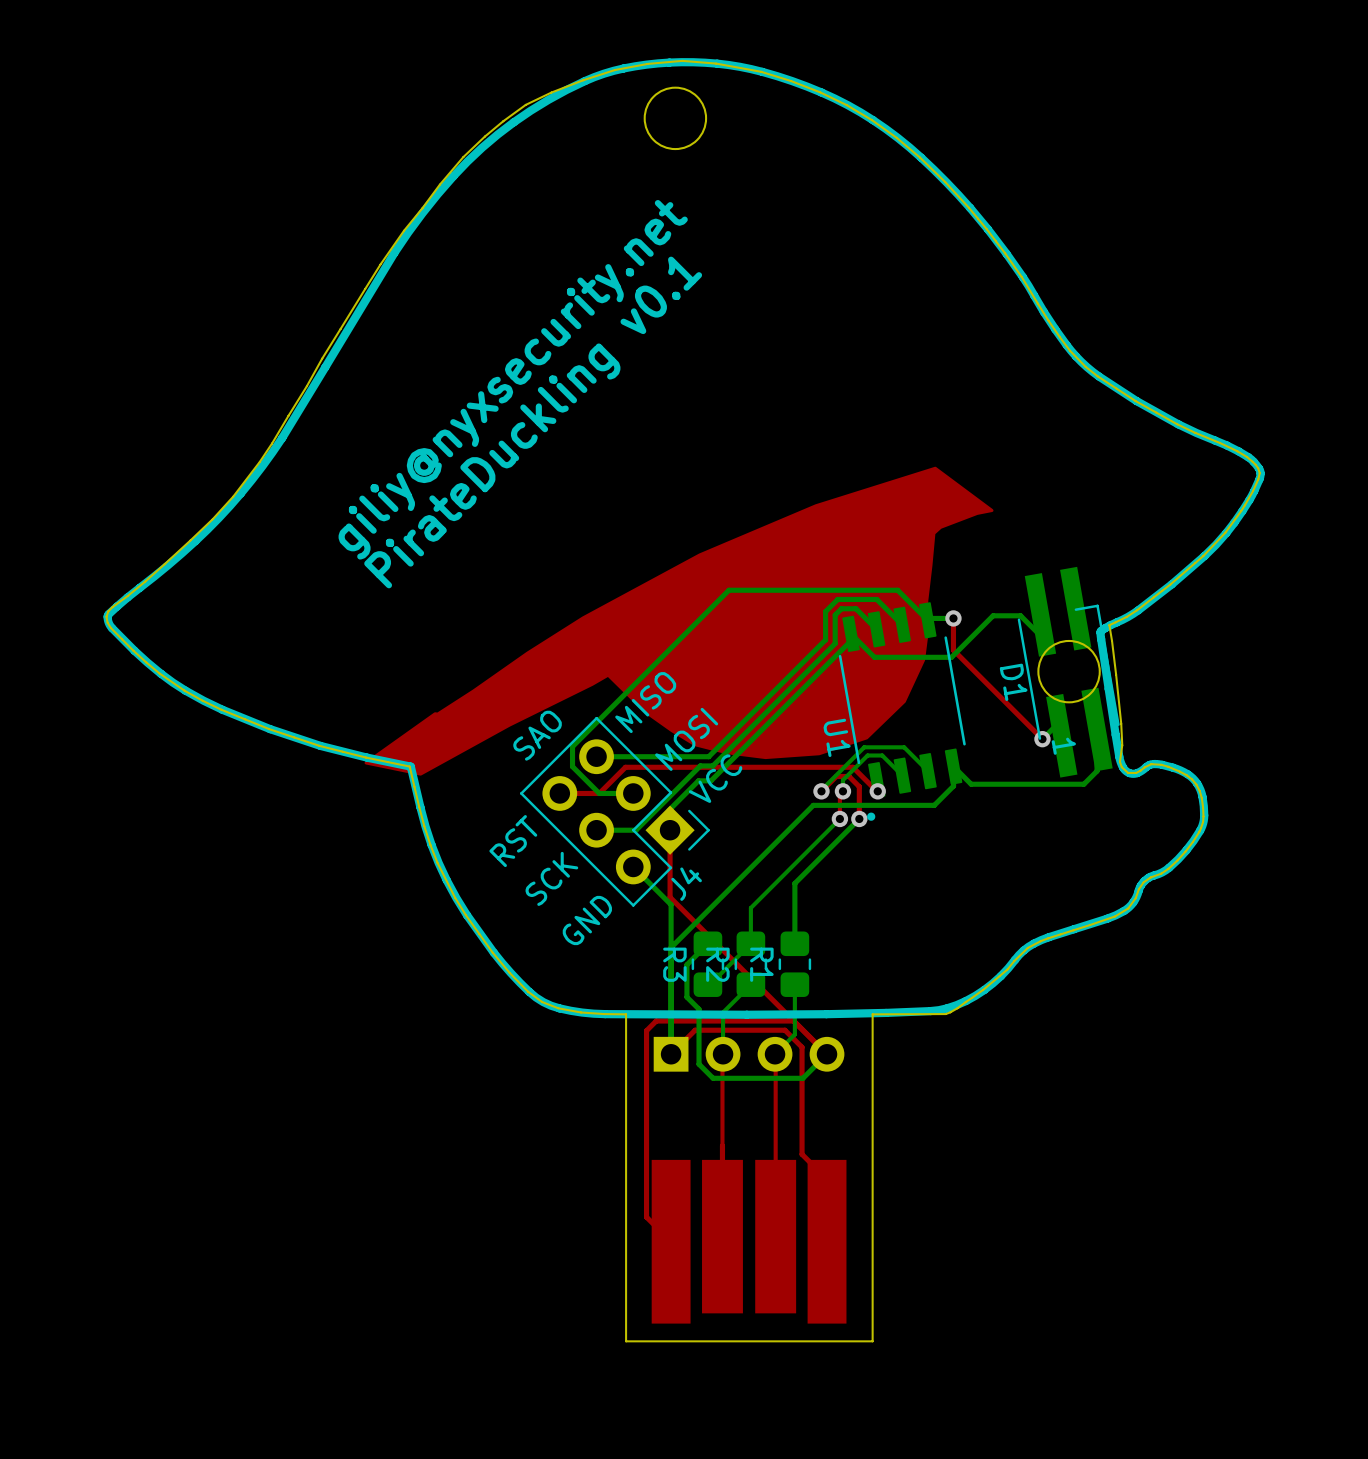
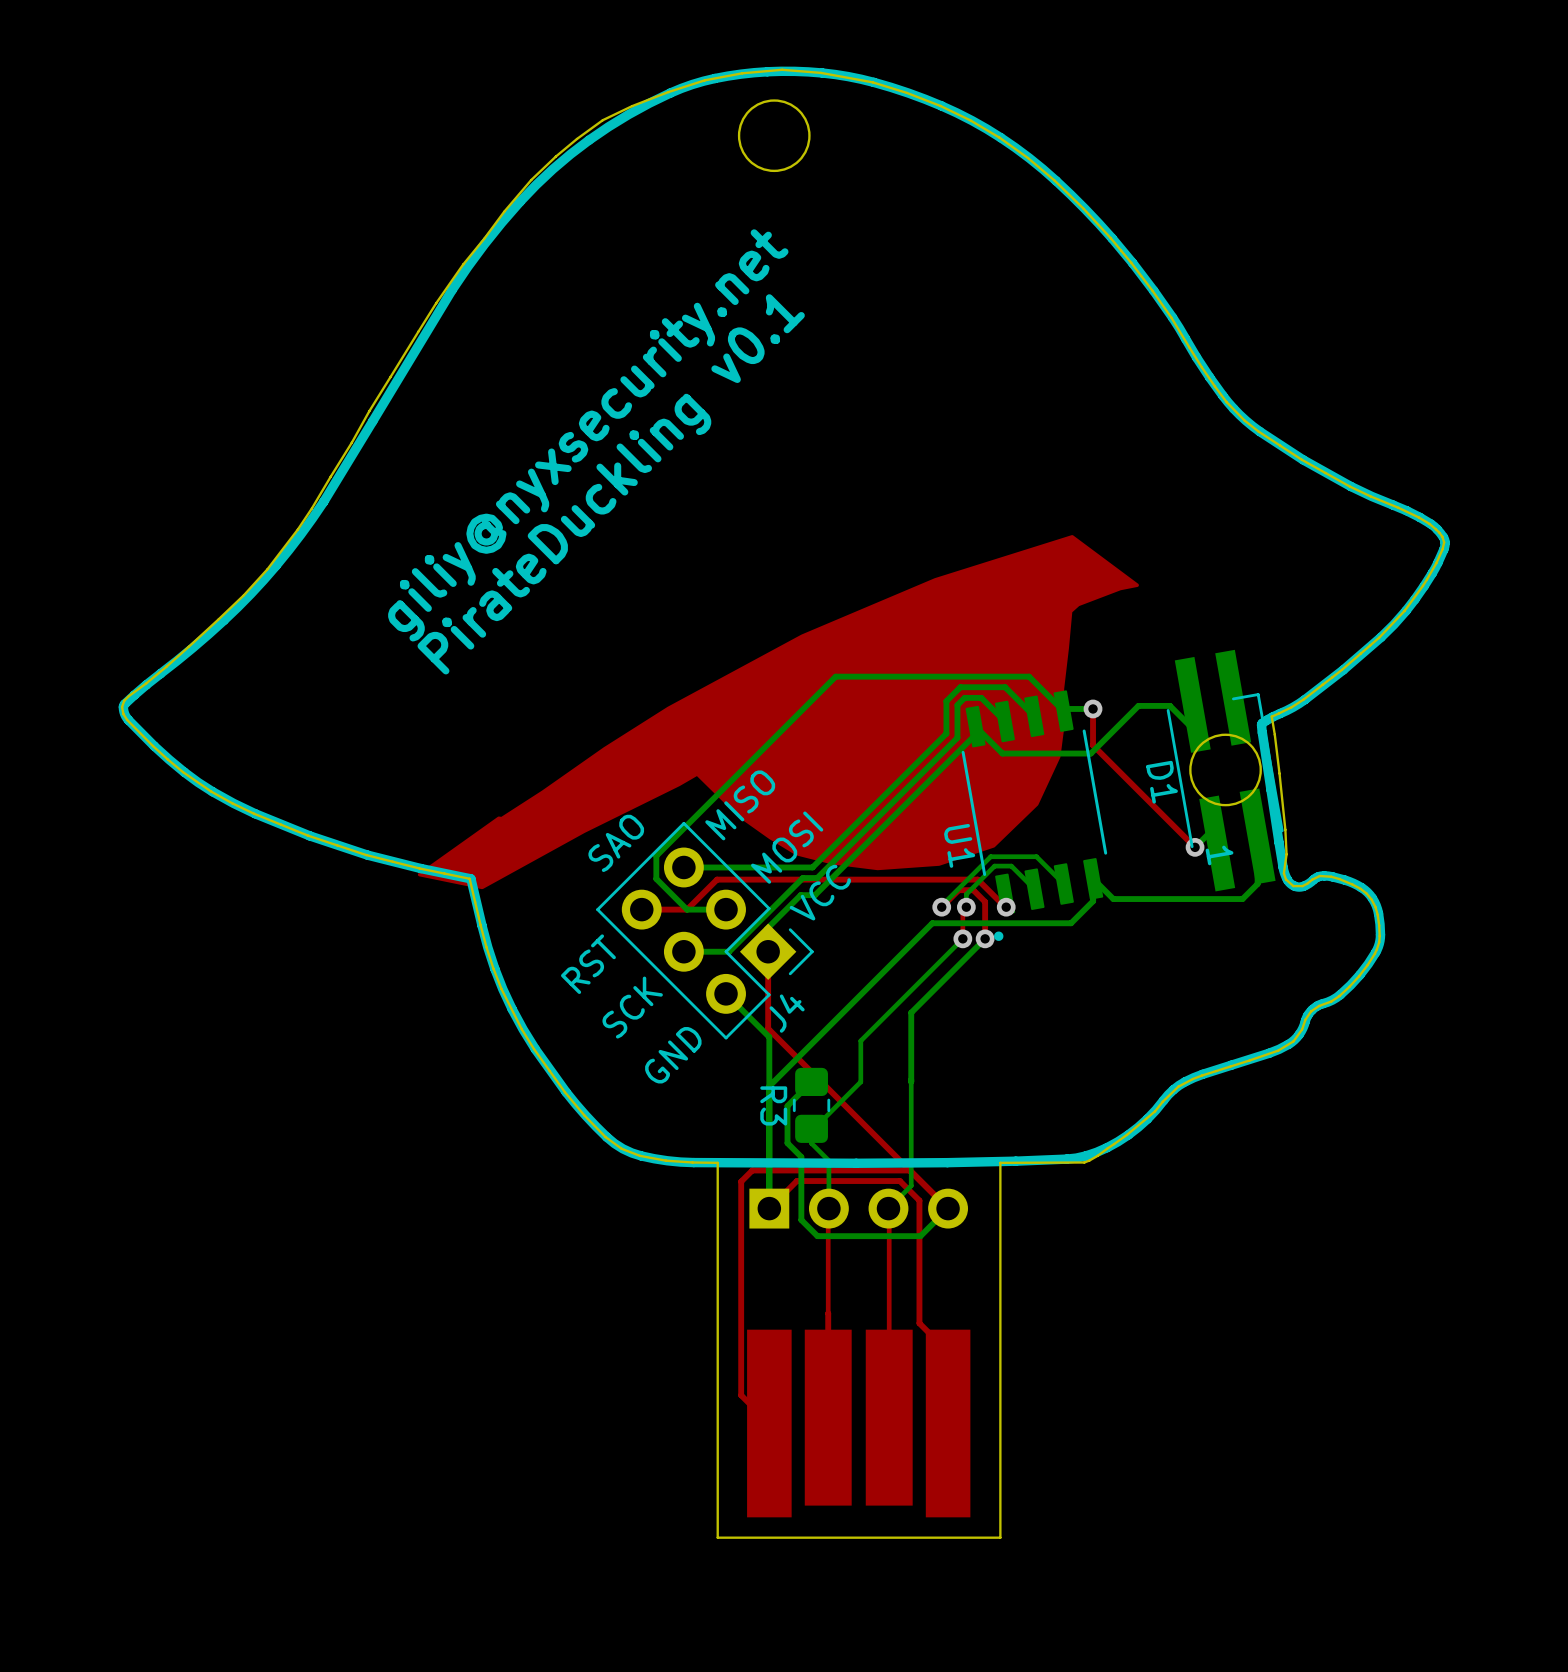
bottom track: none -> (911, 1081) (911, 1128)
R2: (750, 964) -> none
R1: (794, 964) -> none
bottom track: (750, 984) (723, 1012) -> (811, 1128) (811, 1143) (828, 1160)

